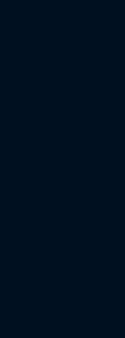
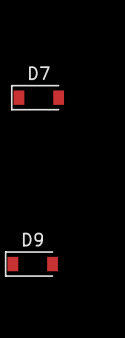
D7: none -> (37, 97)
D9: none -> (31, 264)

